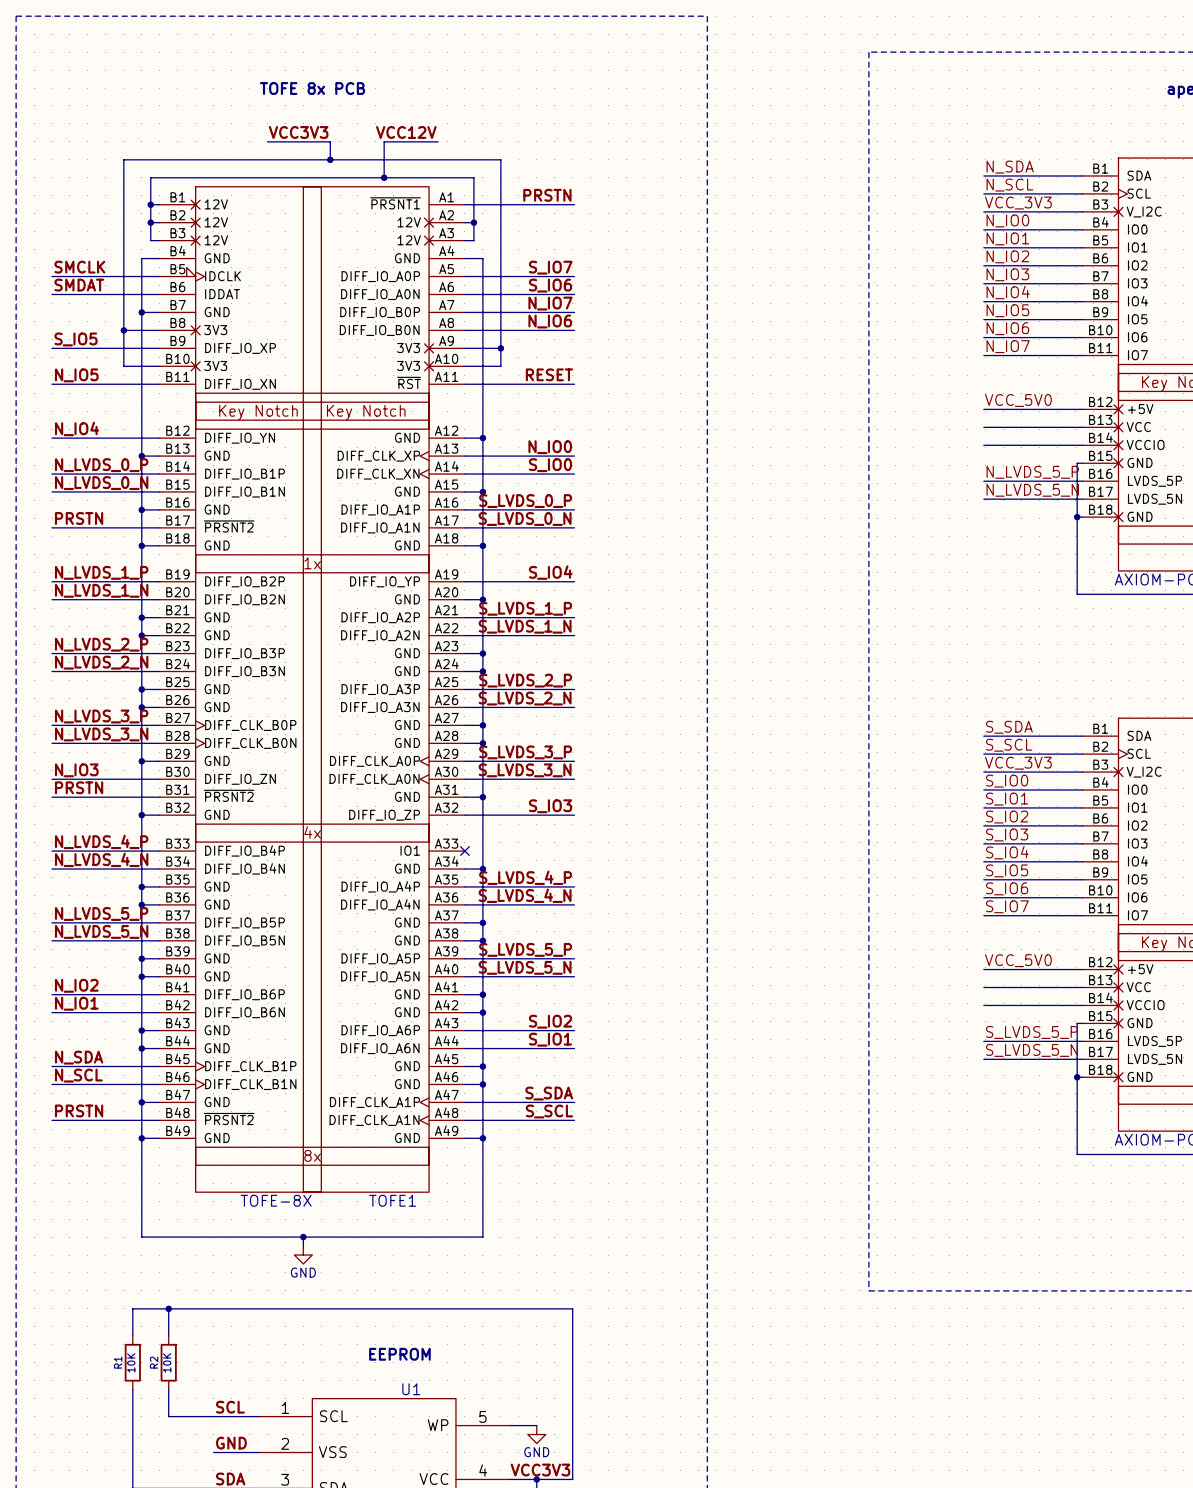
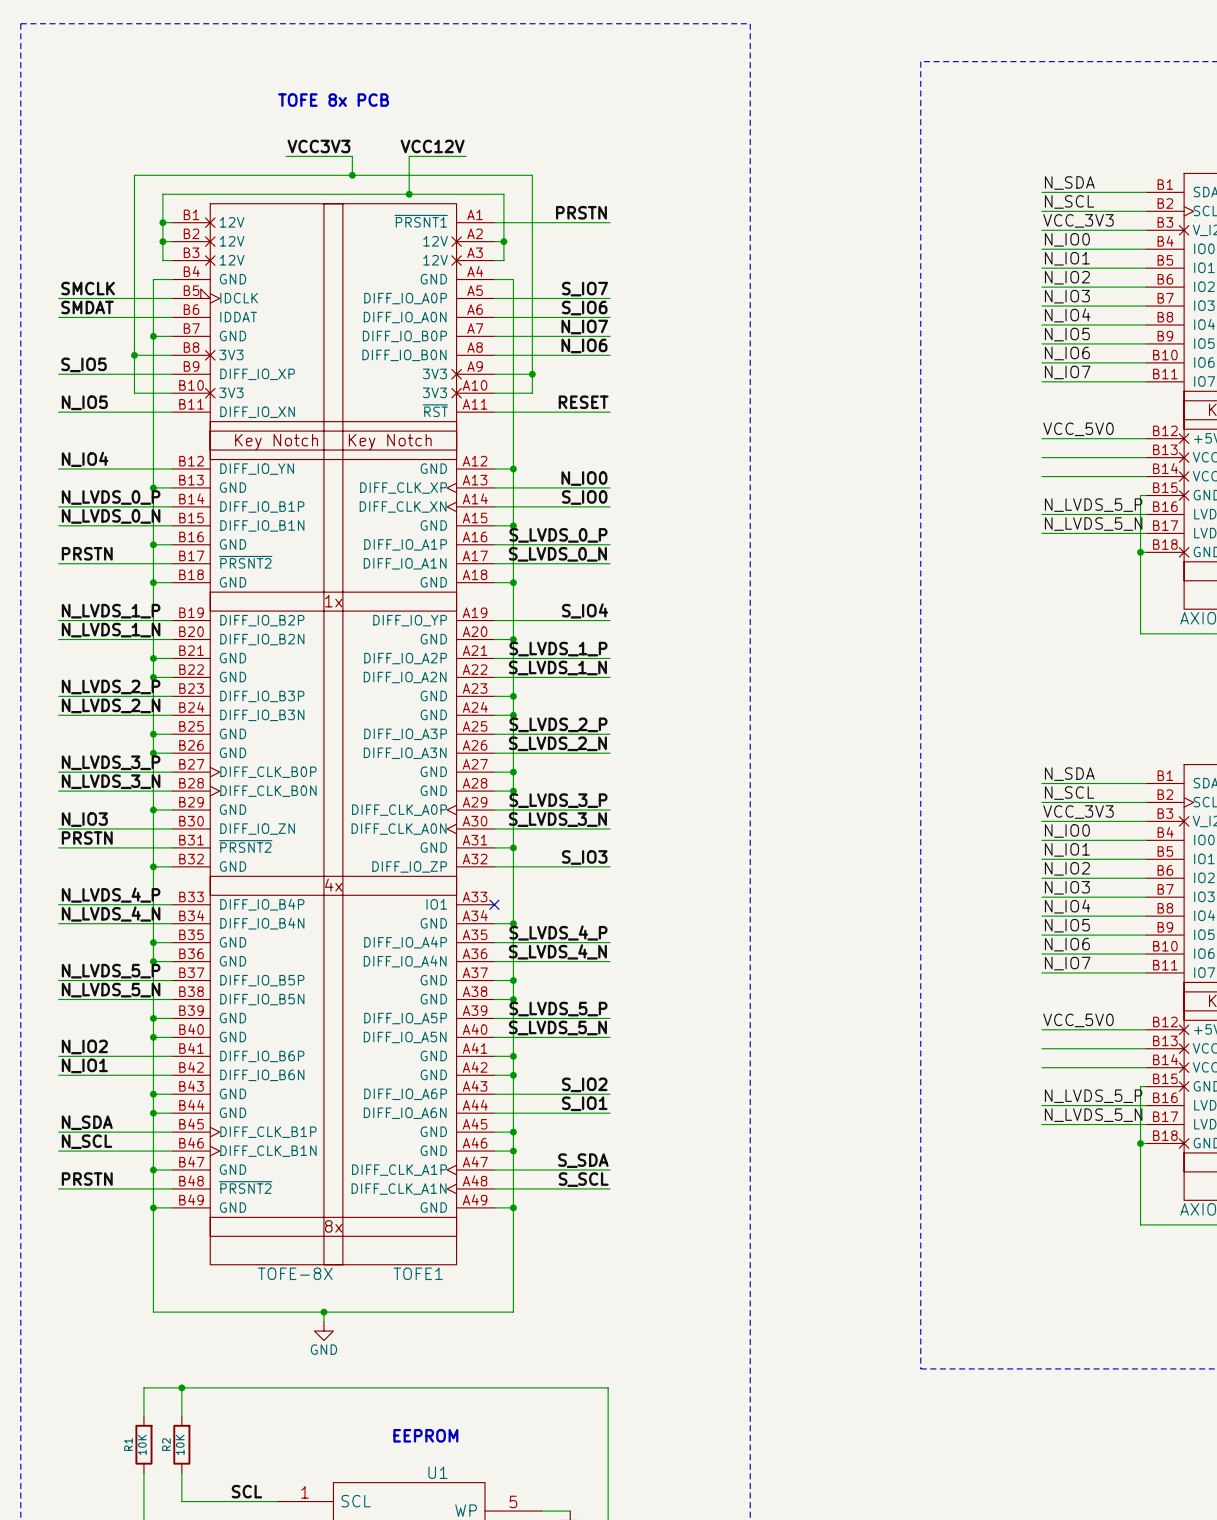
label: S_SDA (1009, 727) -> N_SDA (1069, 774)
label: S_SCL (1009, 745) -> N_SCL (1069, 793)
label: S_IO0 (1007, 781) -> N_IO0 (1067, 830)
label: S_IO1 (1007, 799) -> N_IO1 (1067, 849)
label: S_IO2 (1007, 817) -> N_IO2 (1067, 868)
label: S_IO3 (1007, 834) -> N_IO3 (1067, 887)
label: S_IO4 (1007, 852) -> N_IO4 (1067, 906)
label: S_IO5 (1007, 870) -> N_IO5 (1067, 925)
label: S_IO6 (1007, 888) -> N_IO6 (1067, 944)
label: S_IO7 (1007, 906) -> N_IO7 (1067, 963)
label: S_LVDS_5_P (1031, 1032) -> N_LVDS_5_P (1093, 1096)
label: S_LVDS_5_N (1031, 1050) -> N_LVDS_5_N (1093, 1115)

